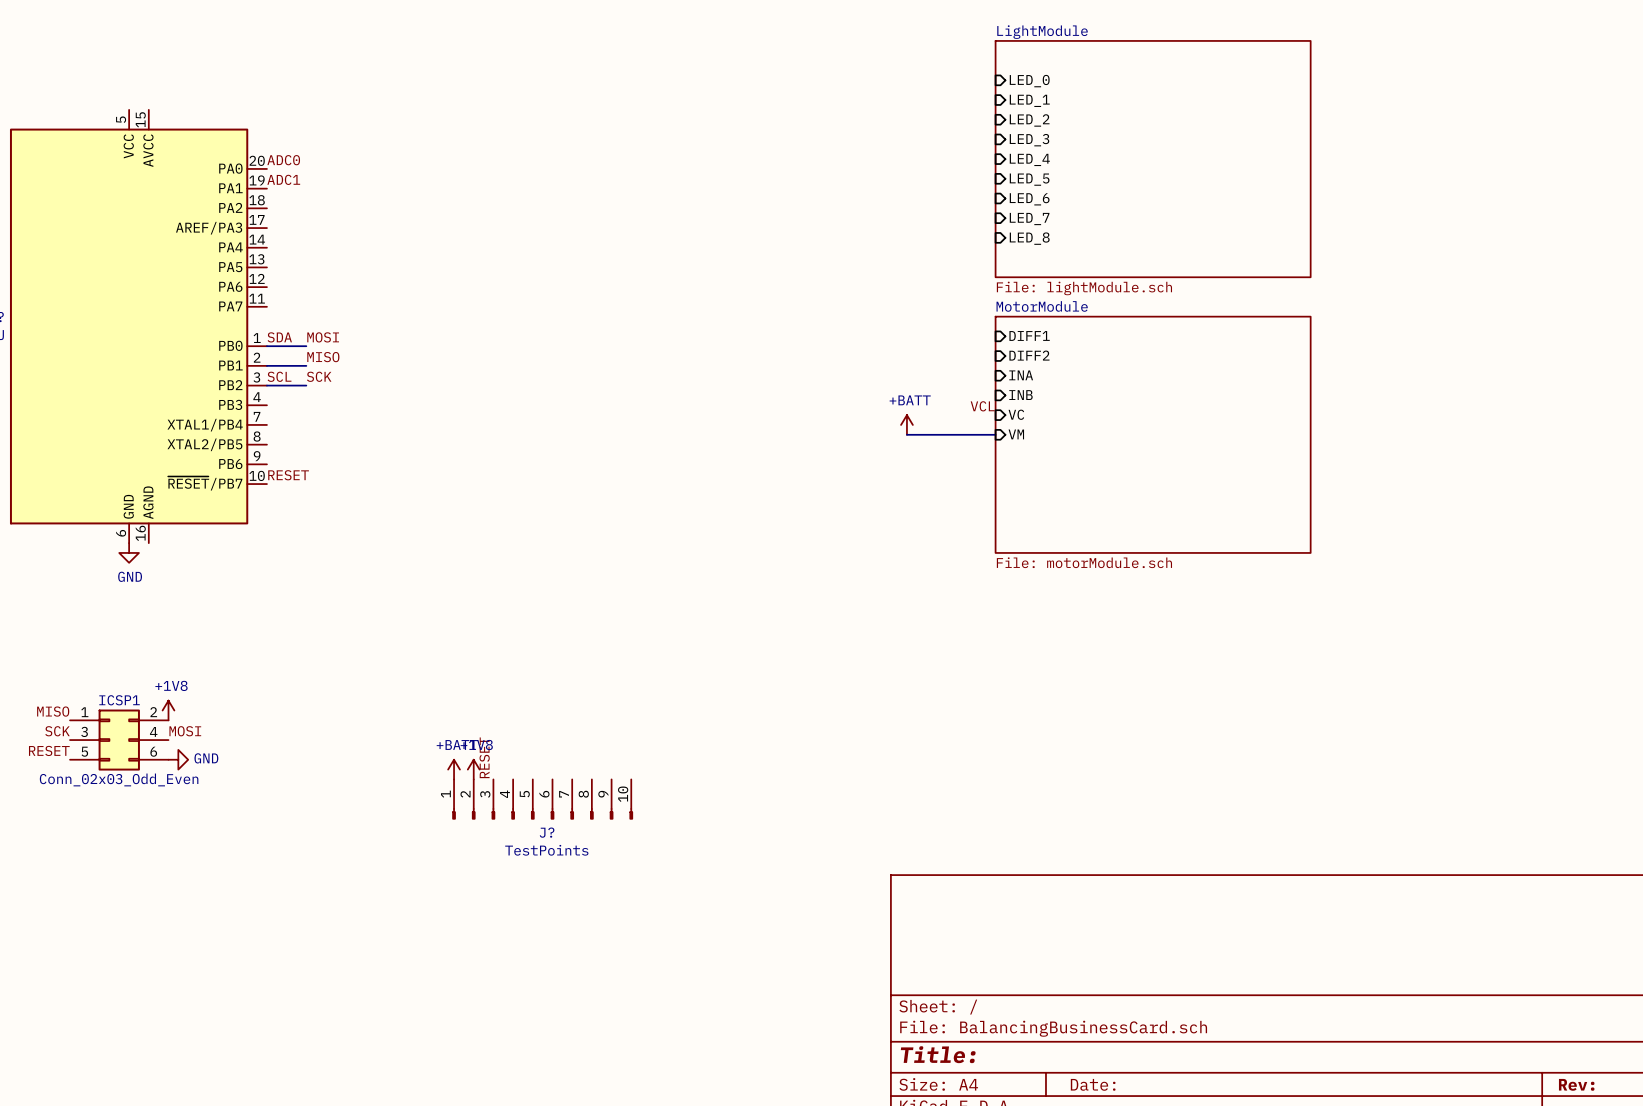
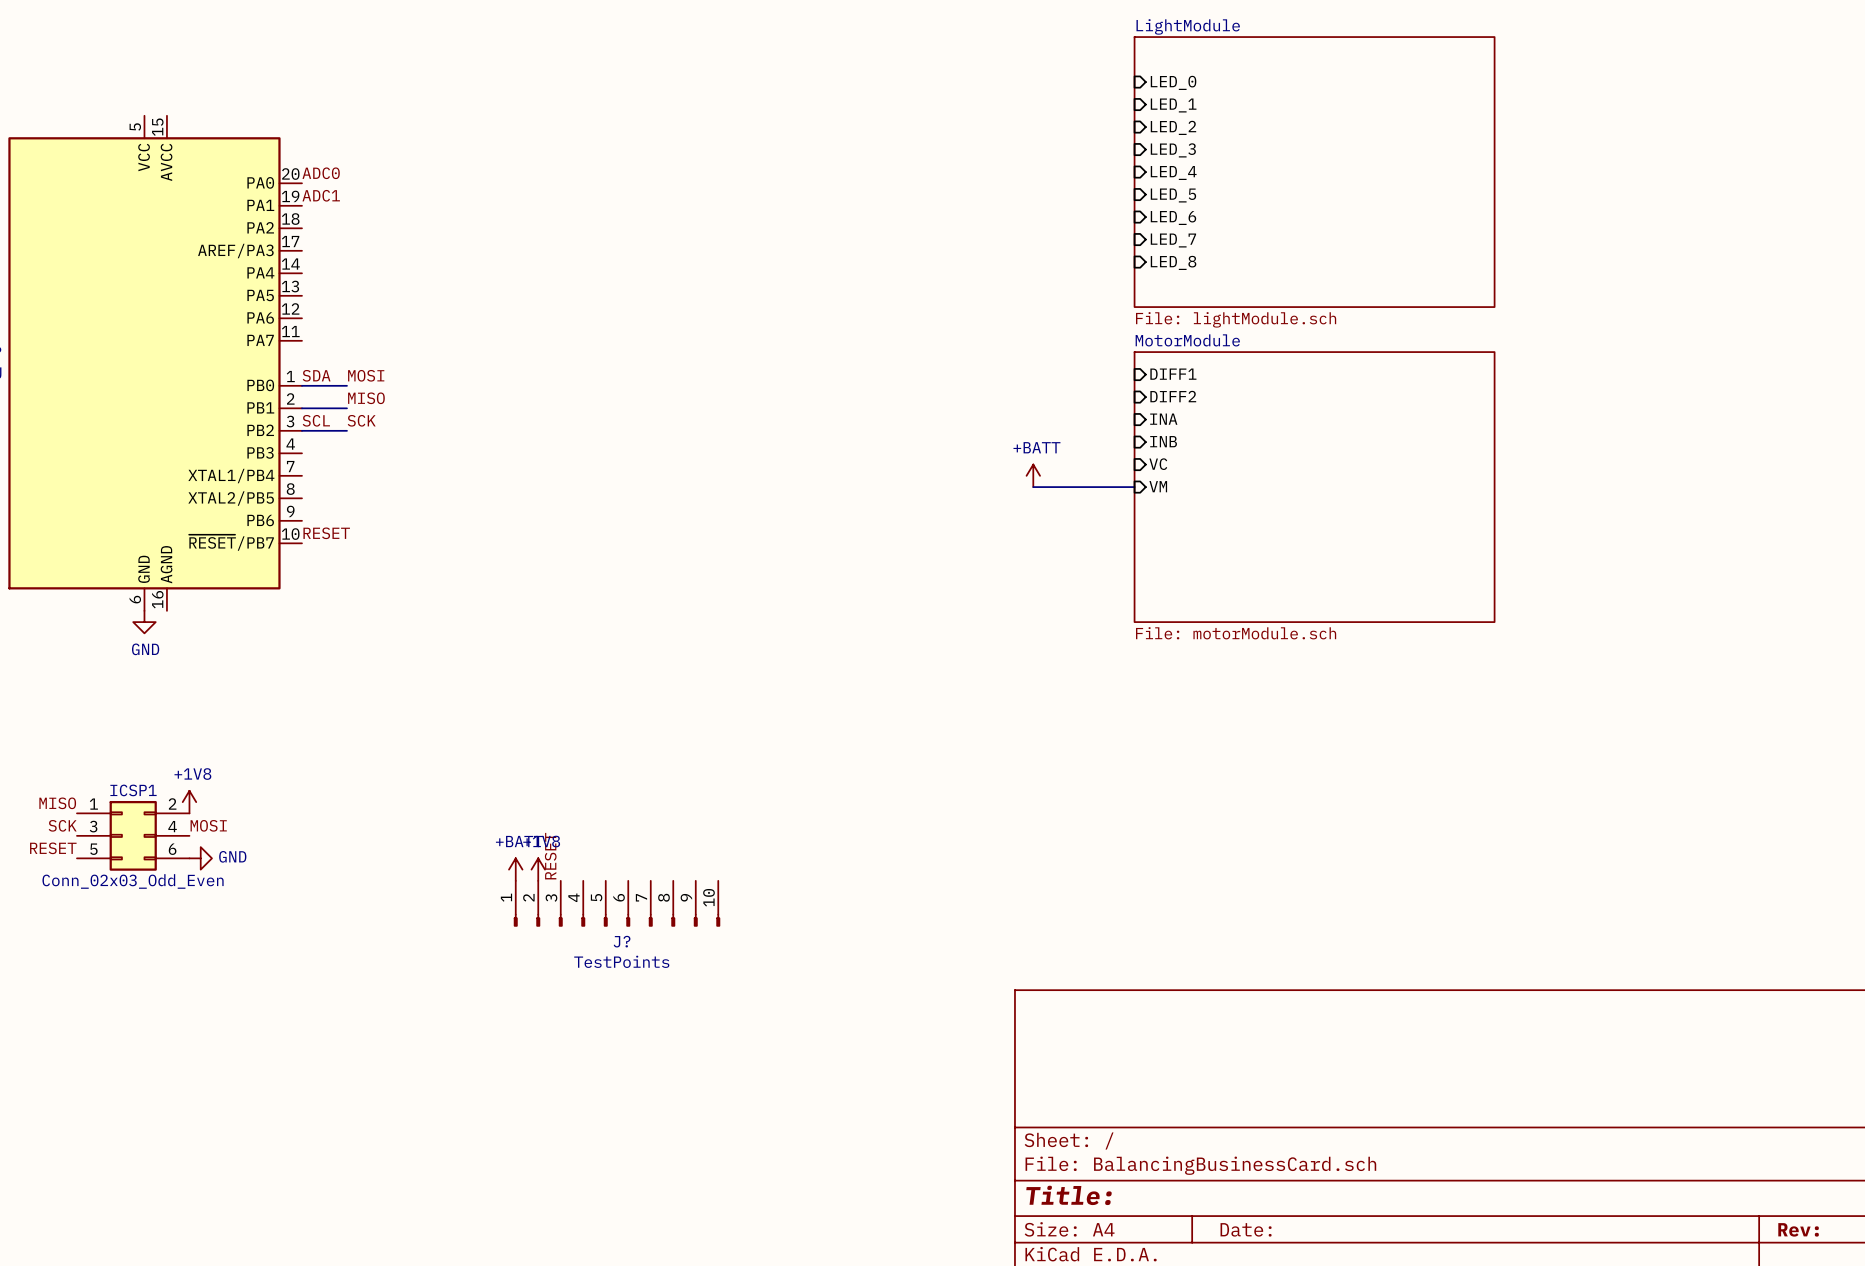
label: VCL (982, 406) -> none

